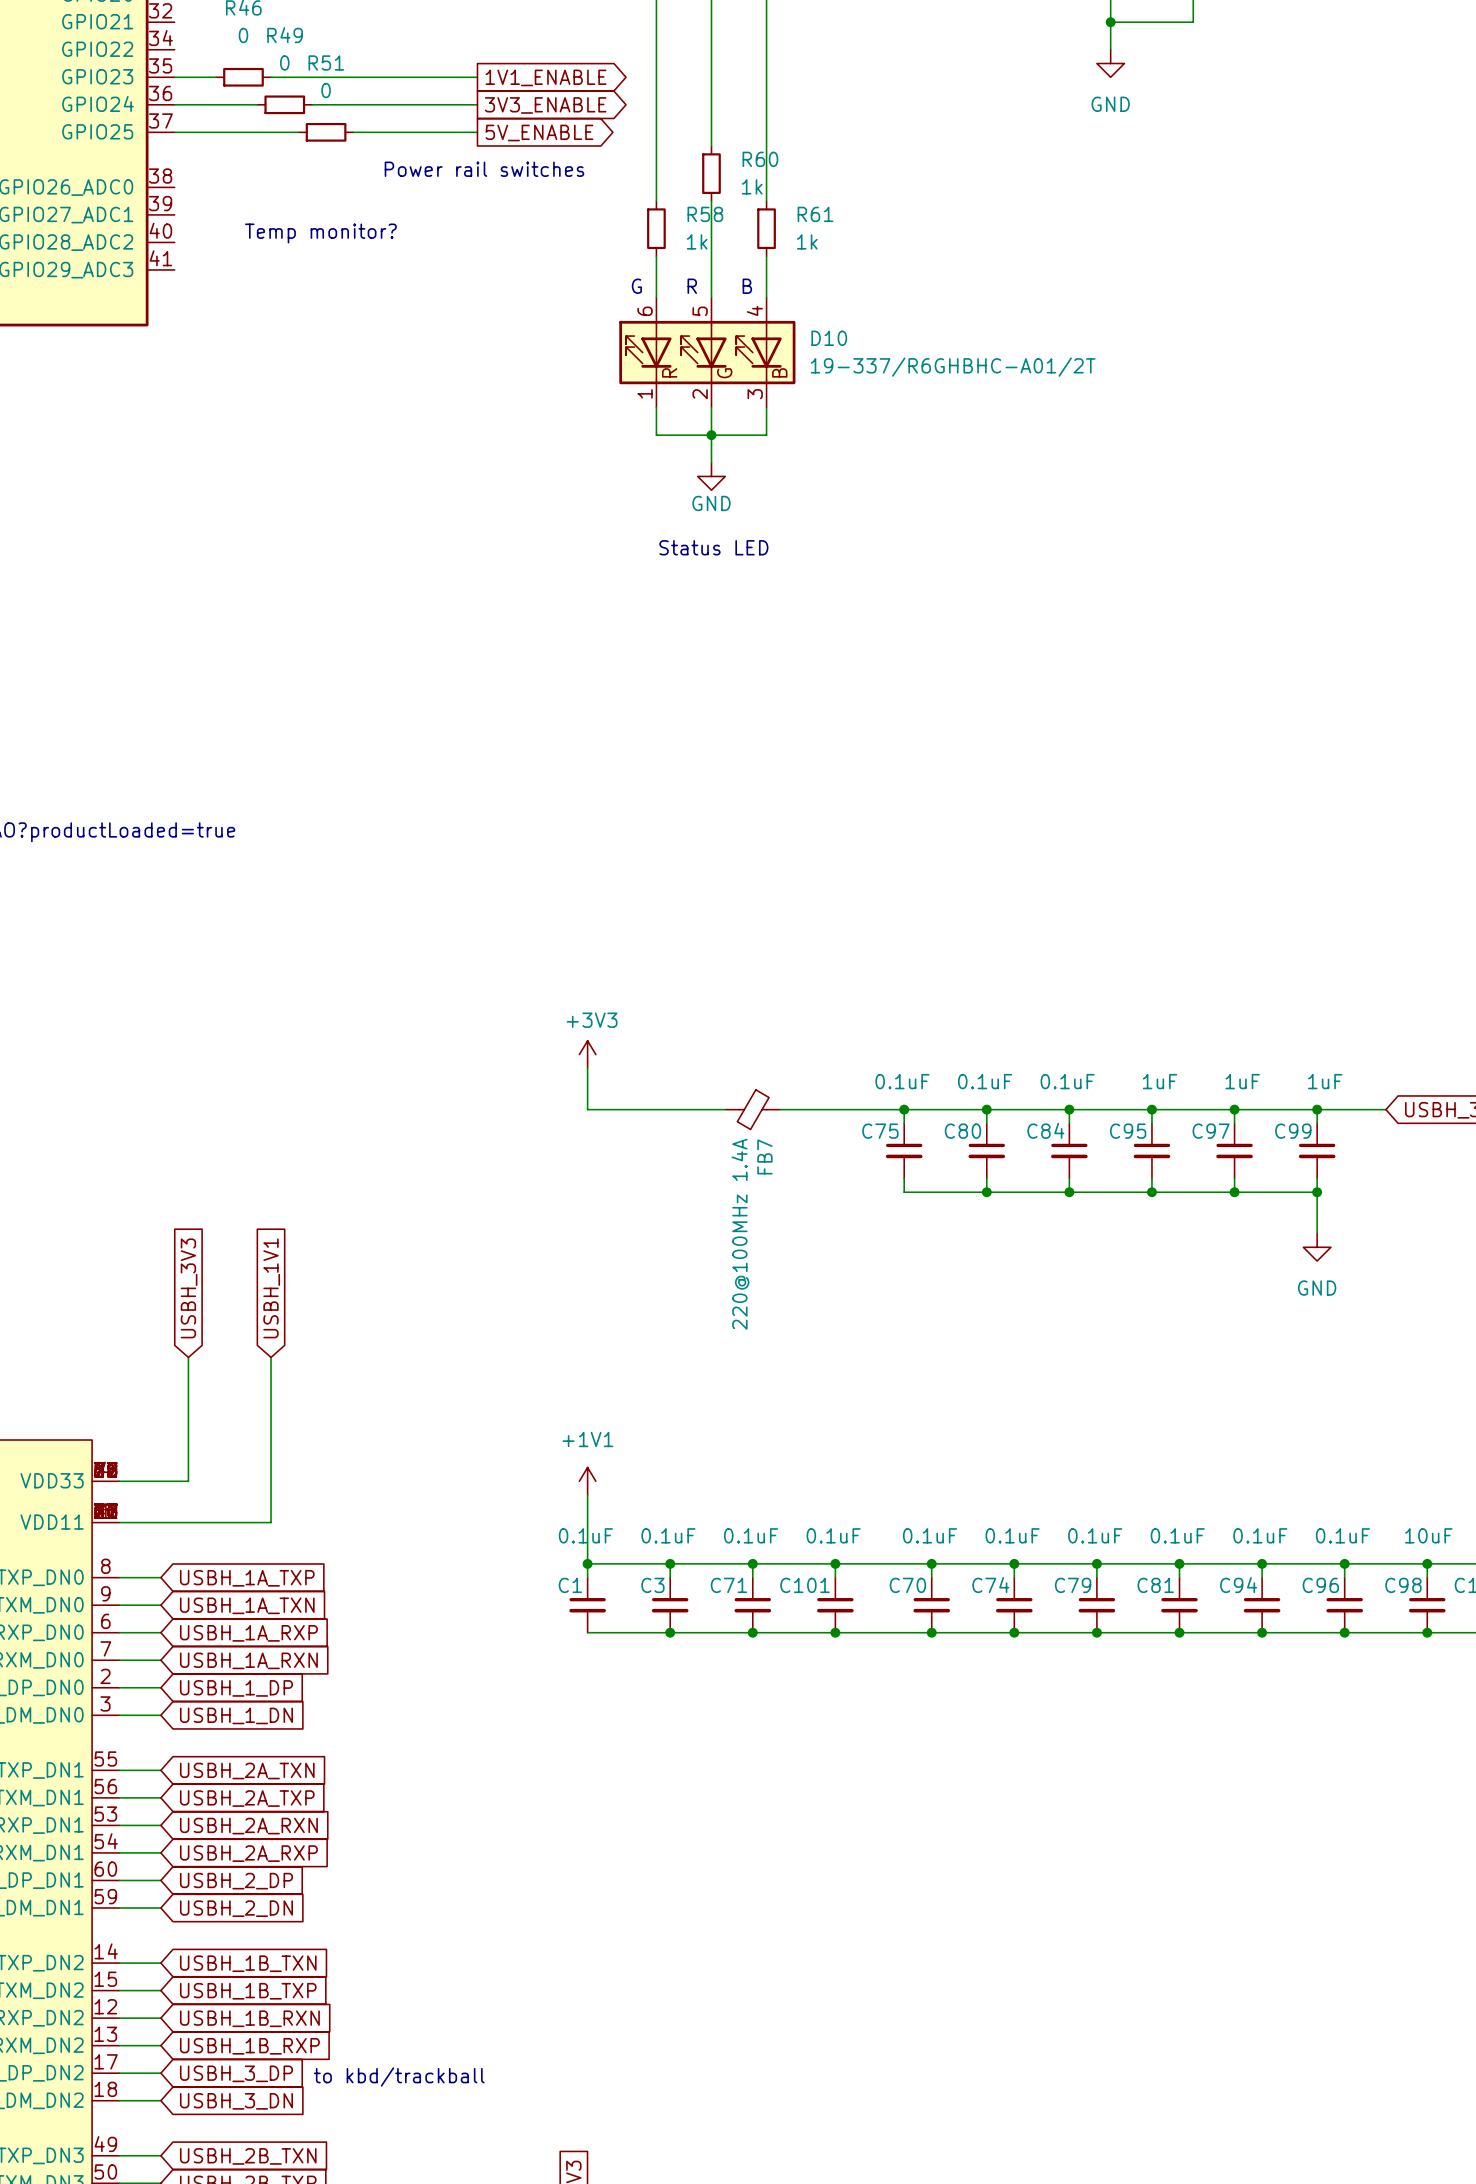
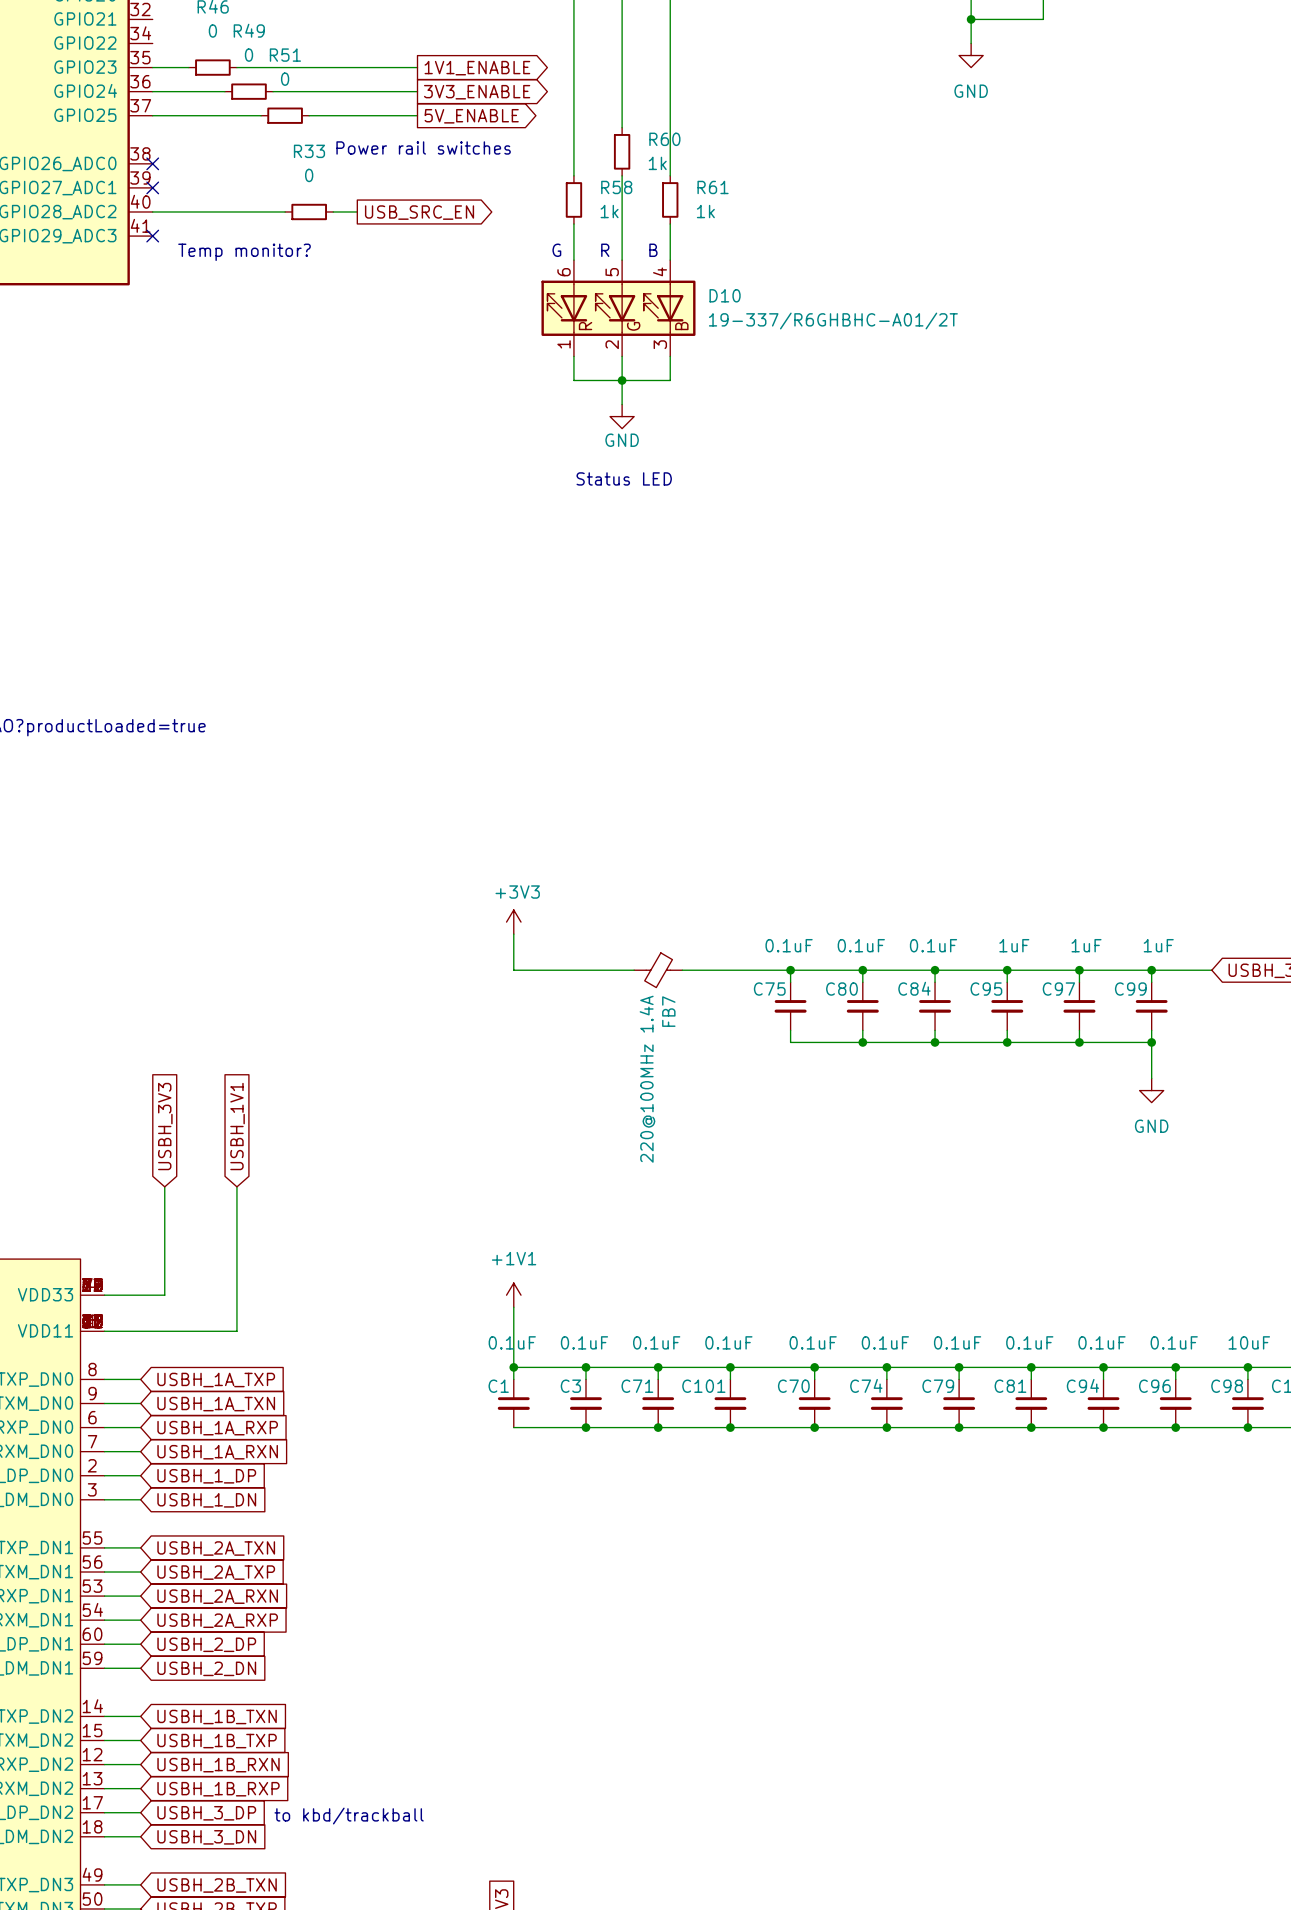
no-connect mark: none -> (152, 163)
no-connect mark: none -> (152, 187)
text position: Temp monitor? (320, 233) -> Temp monitor? (244, 252)
wire: none -> (152, 211) (285, 211)
R33: none -> 0 (309, 211)
wire: none -> (333, 211) (357, 211)
global label: none -> USB_SRC_EN (419, 212)
no-connect mark: none -> (152, 236)

